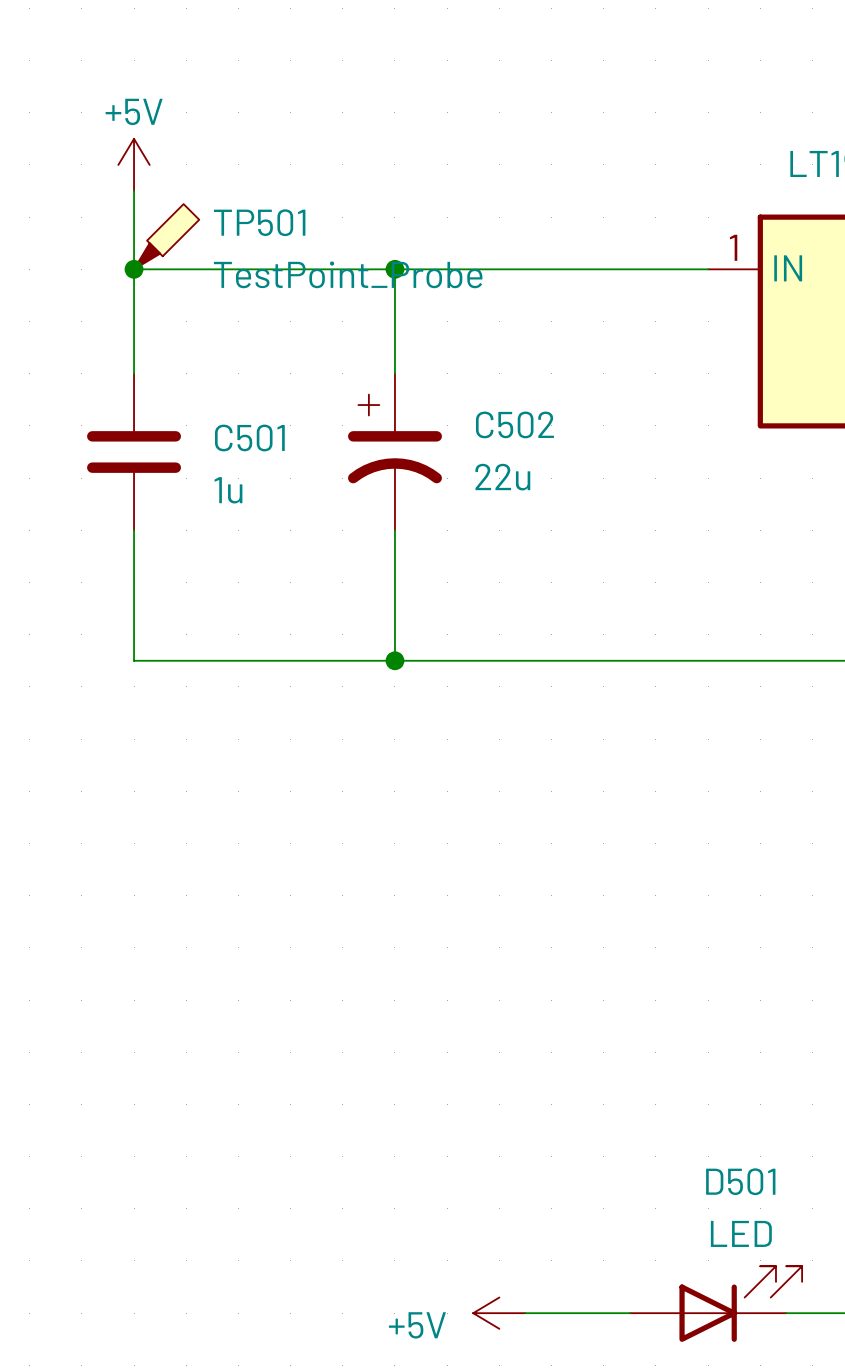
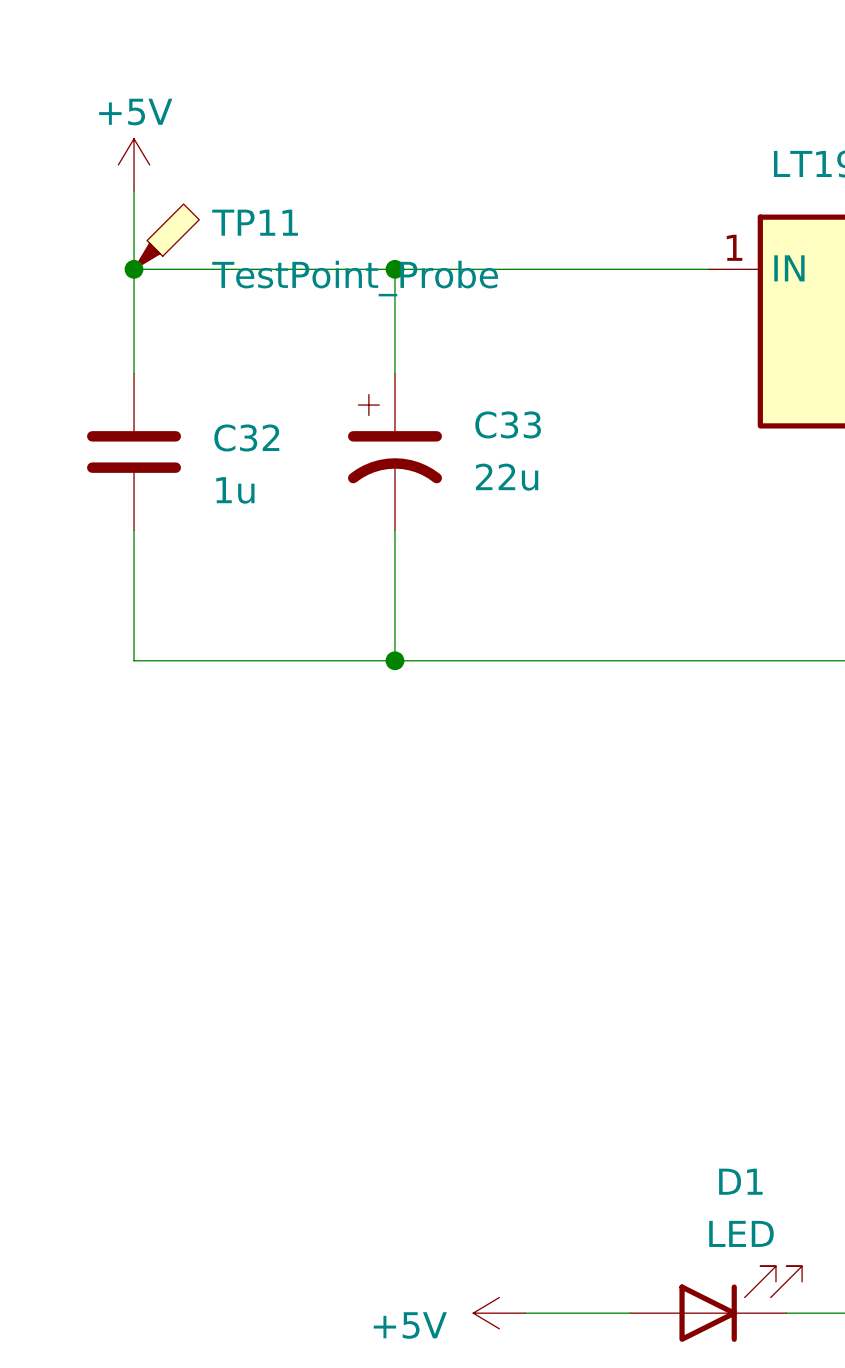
TP501 name: TP501 (259, 222) -> TP11 (255, 222)
C502 name: C502 (514, 424) -> C33 (508, 424)
C501 name: C501 (249, 438) -> C32 (246, 438)
D501 name: D501 (740, 1181) -> D1 (740, 1181)

